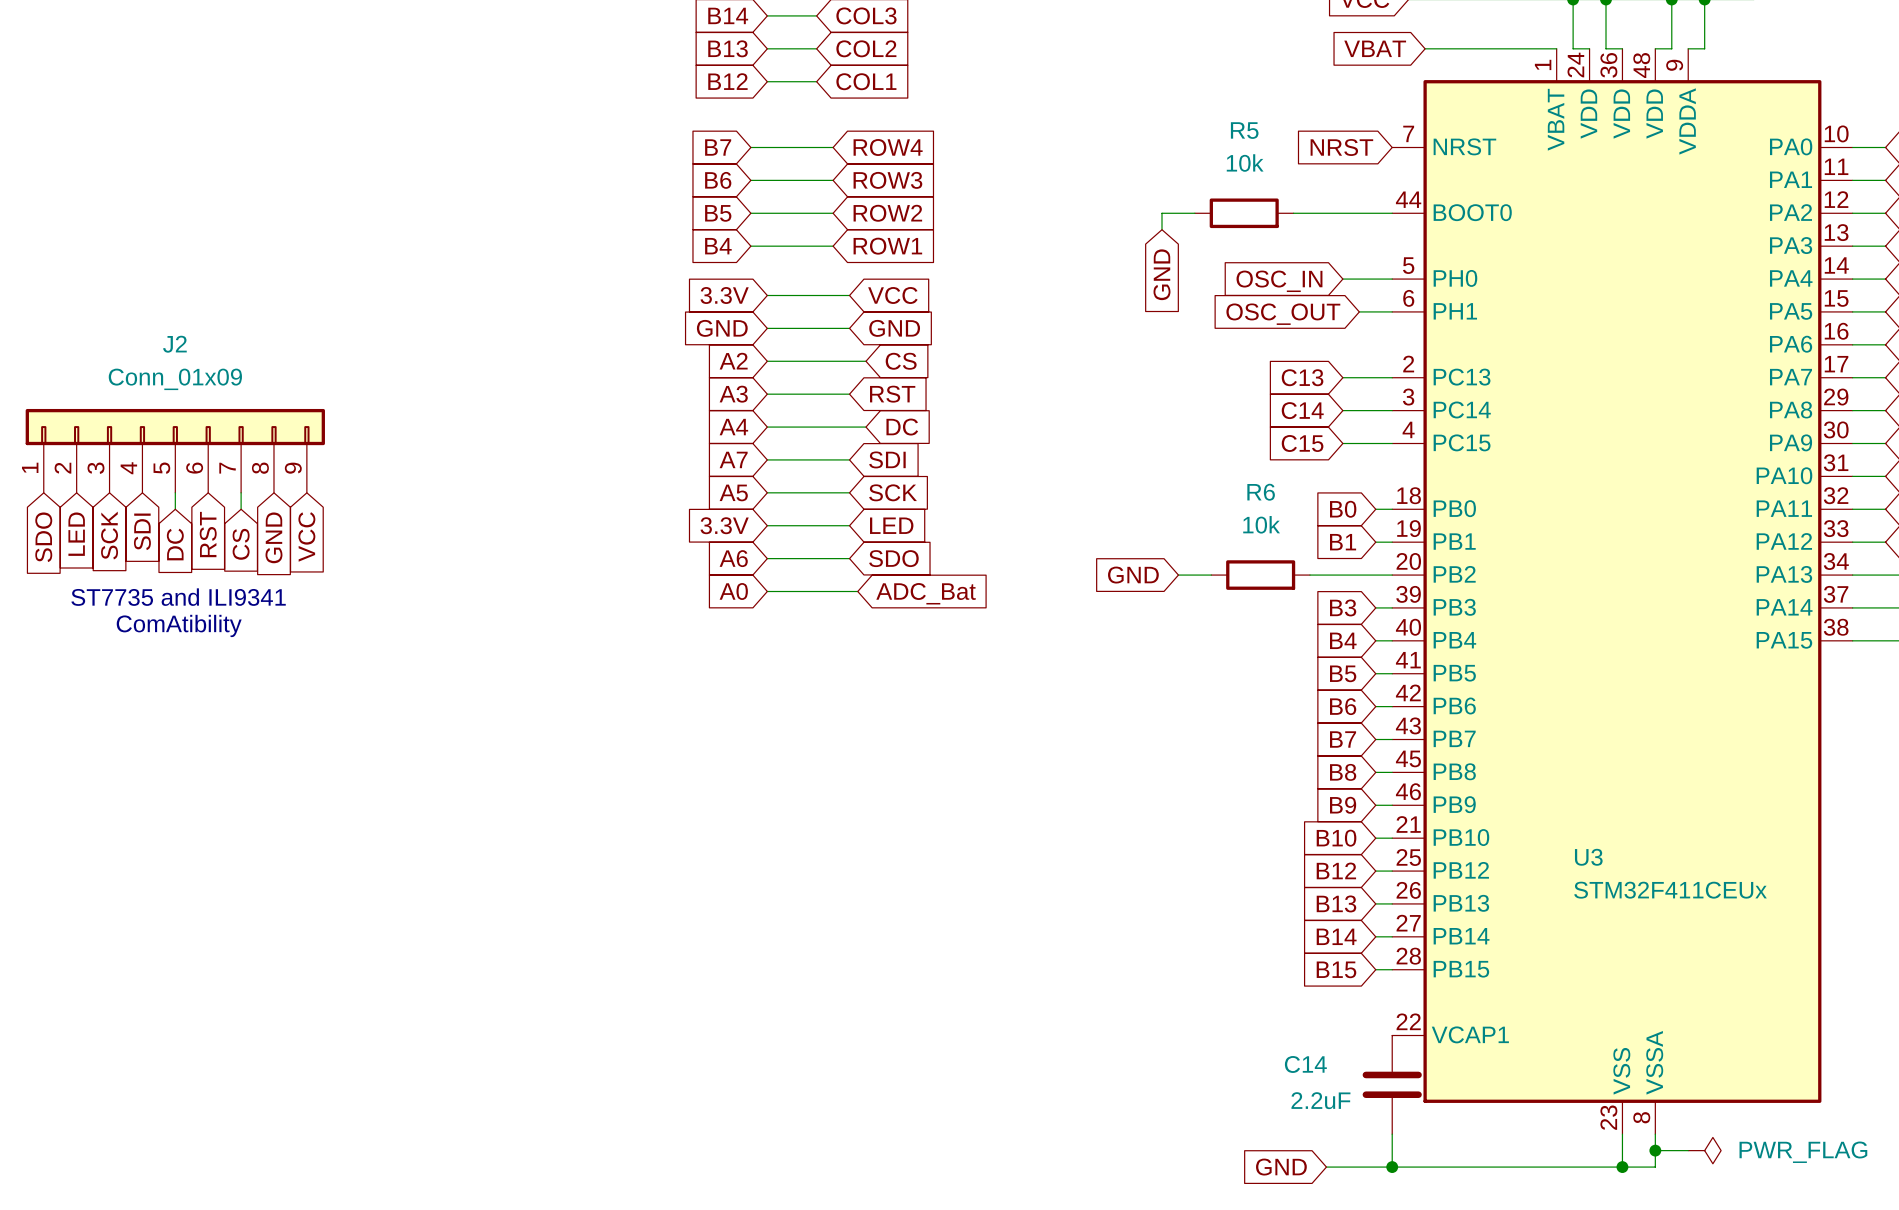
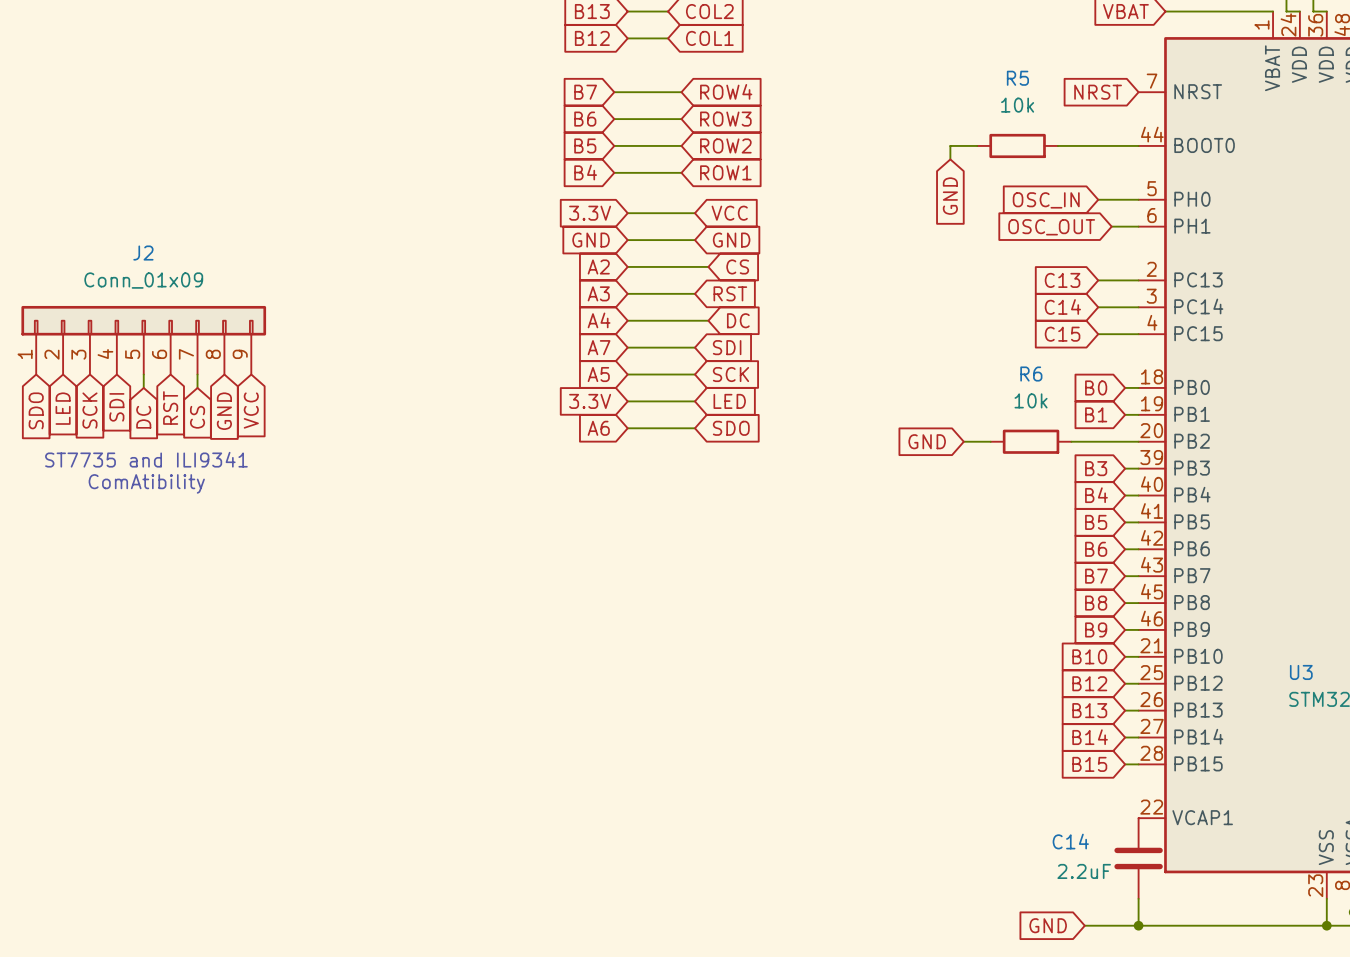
global label: A0 (733, 591) -> none
wire: (767, 591) (857, 591) -> none
global label: ADC_Bat (926, 593) -> none

